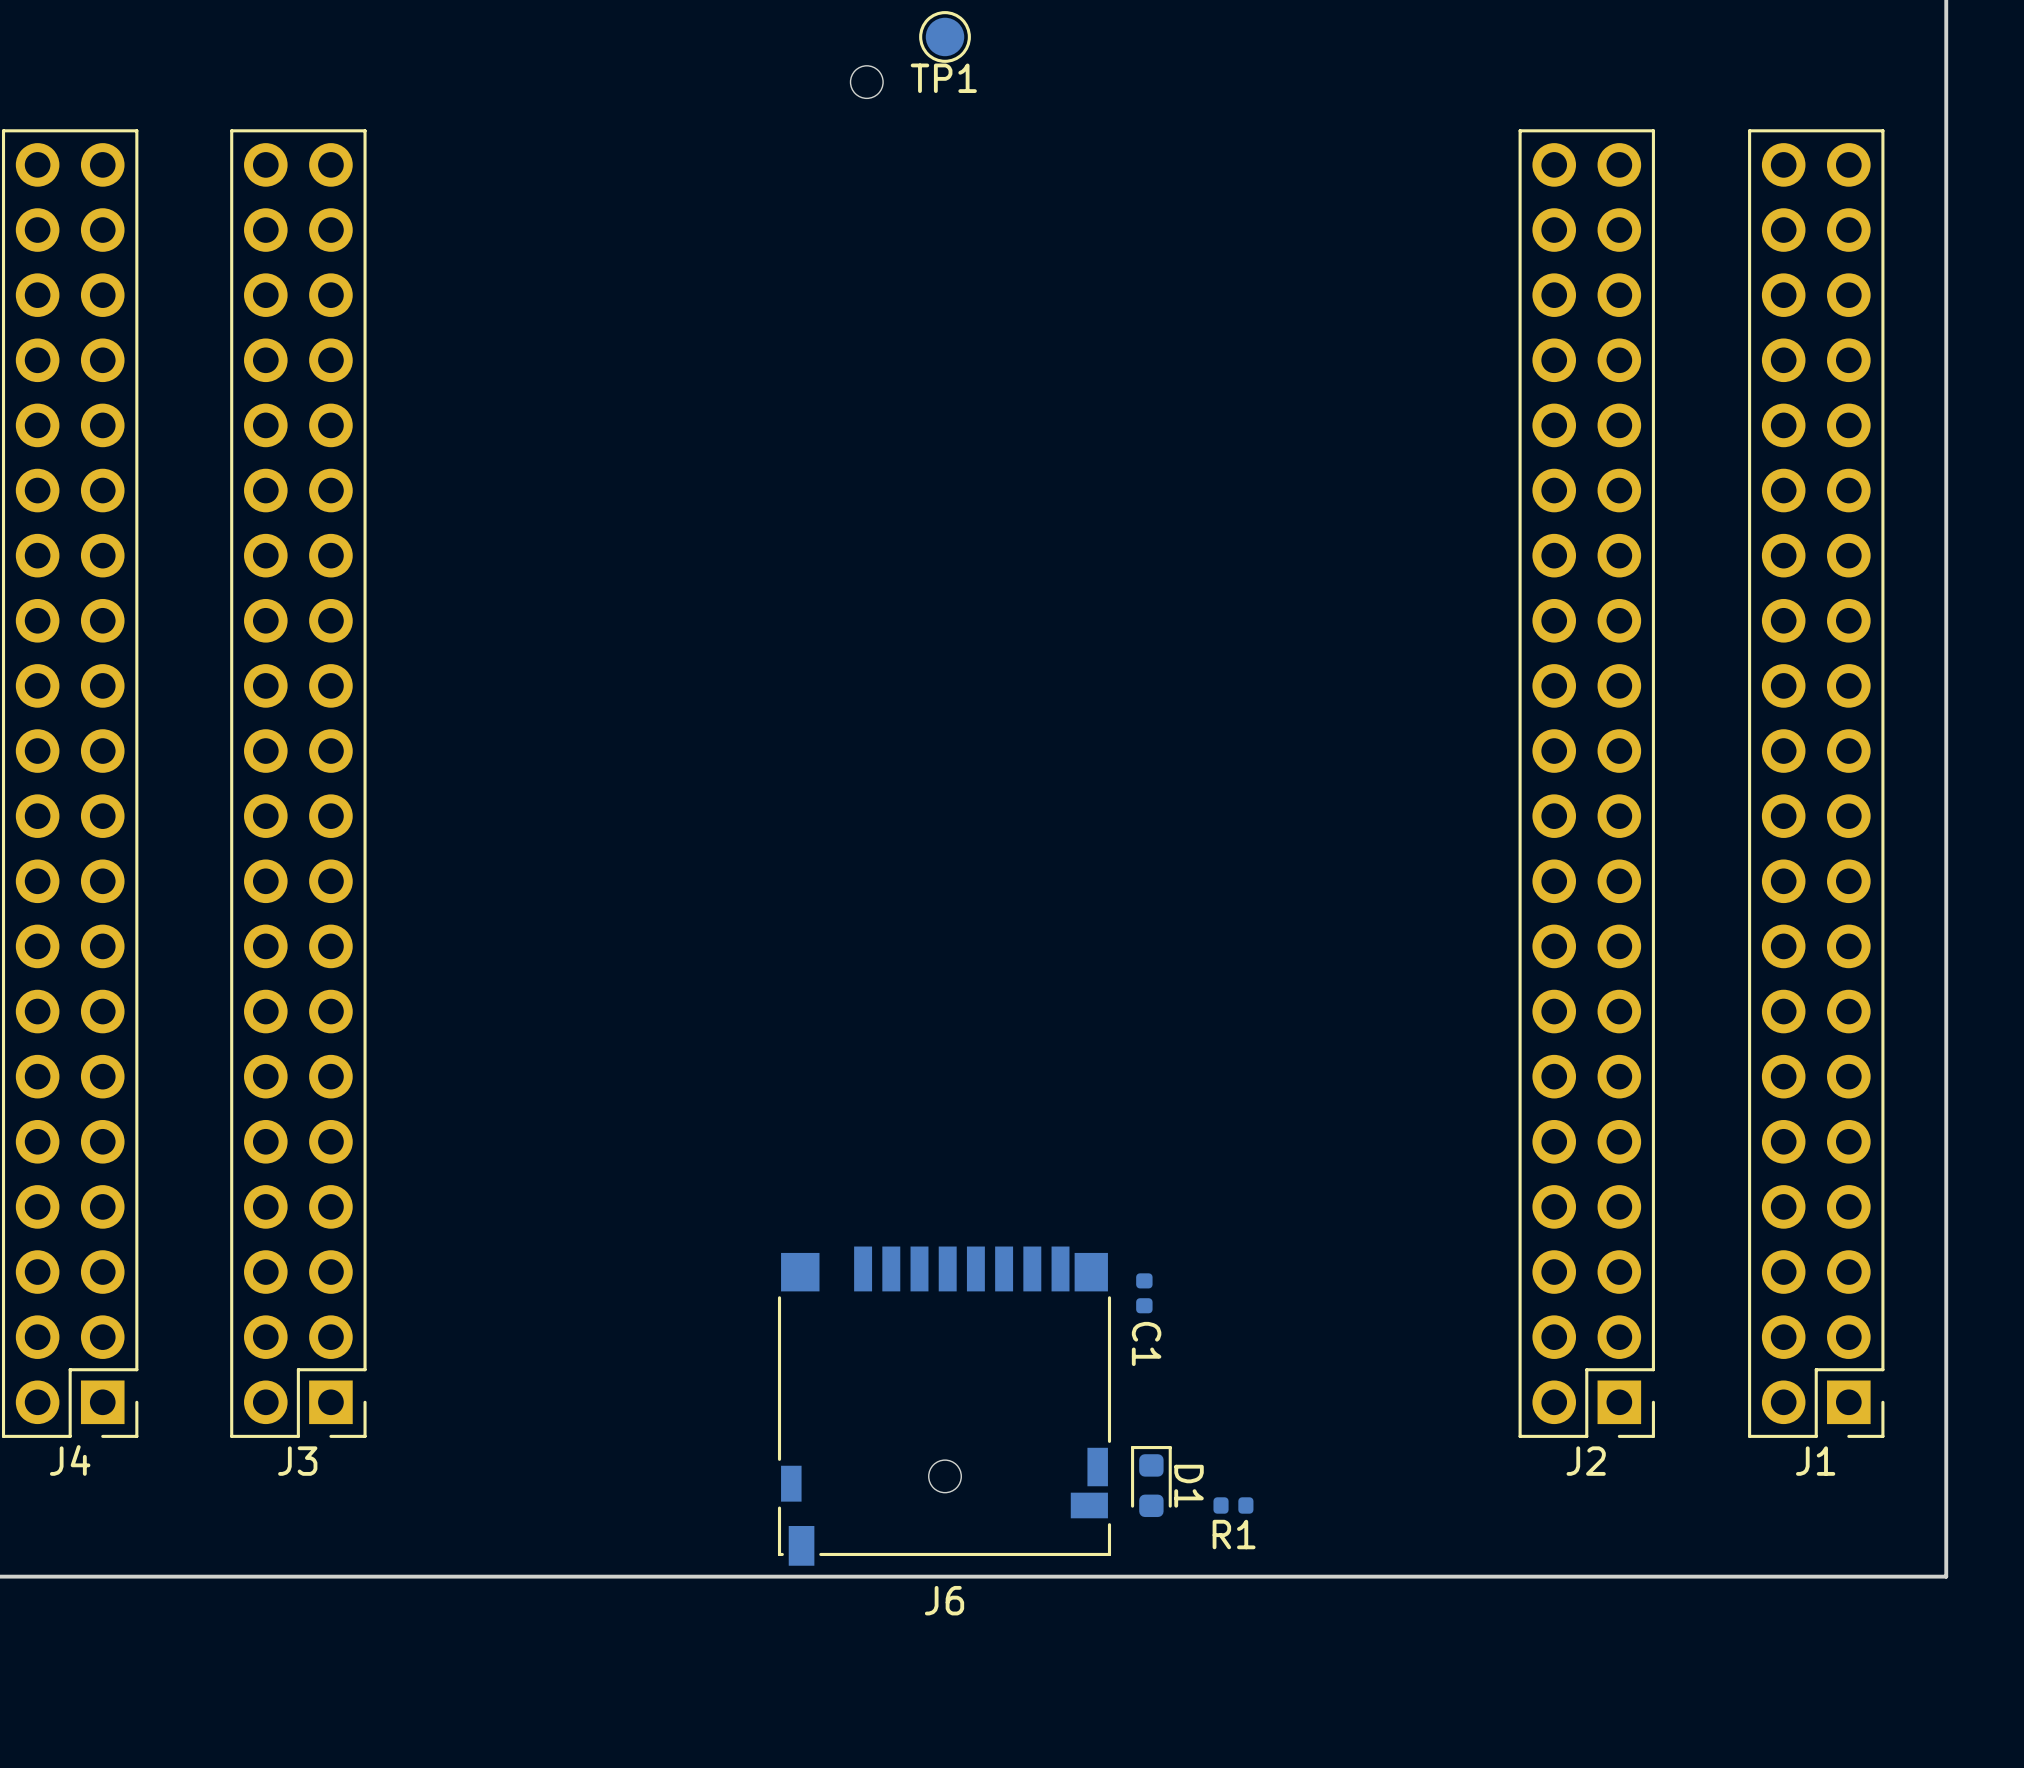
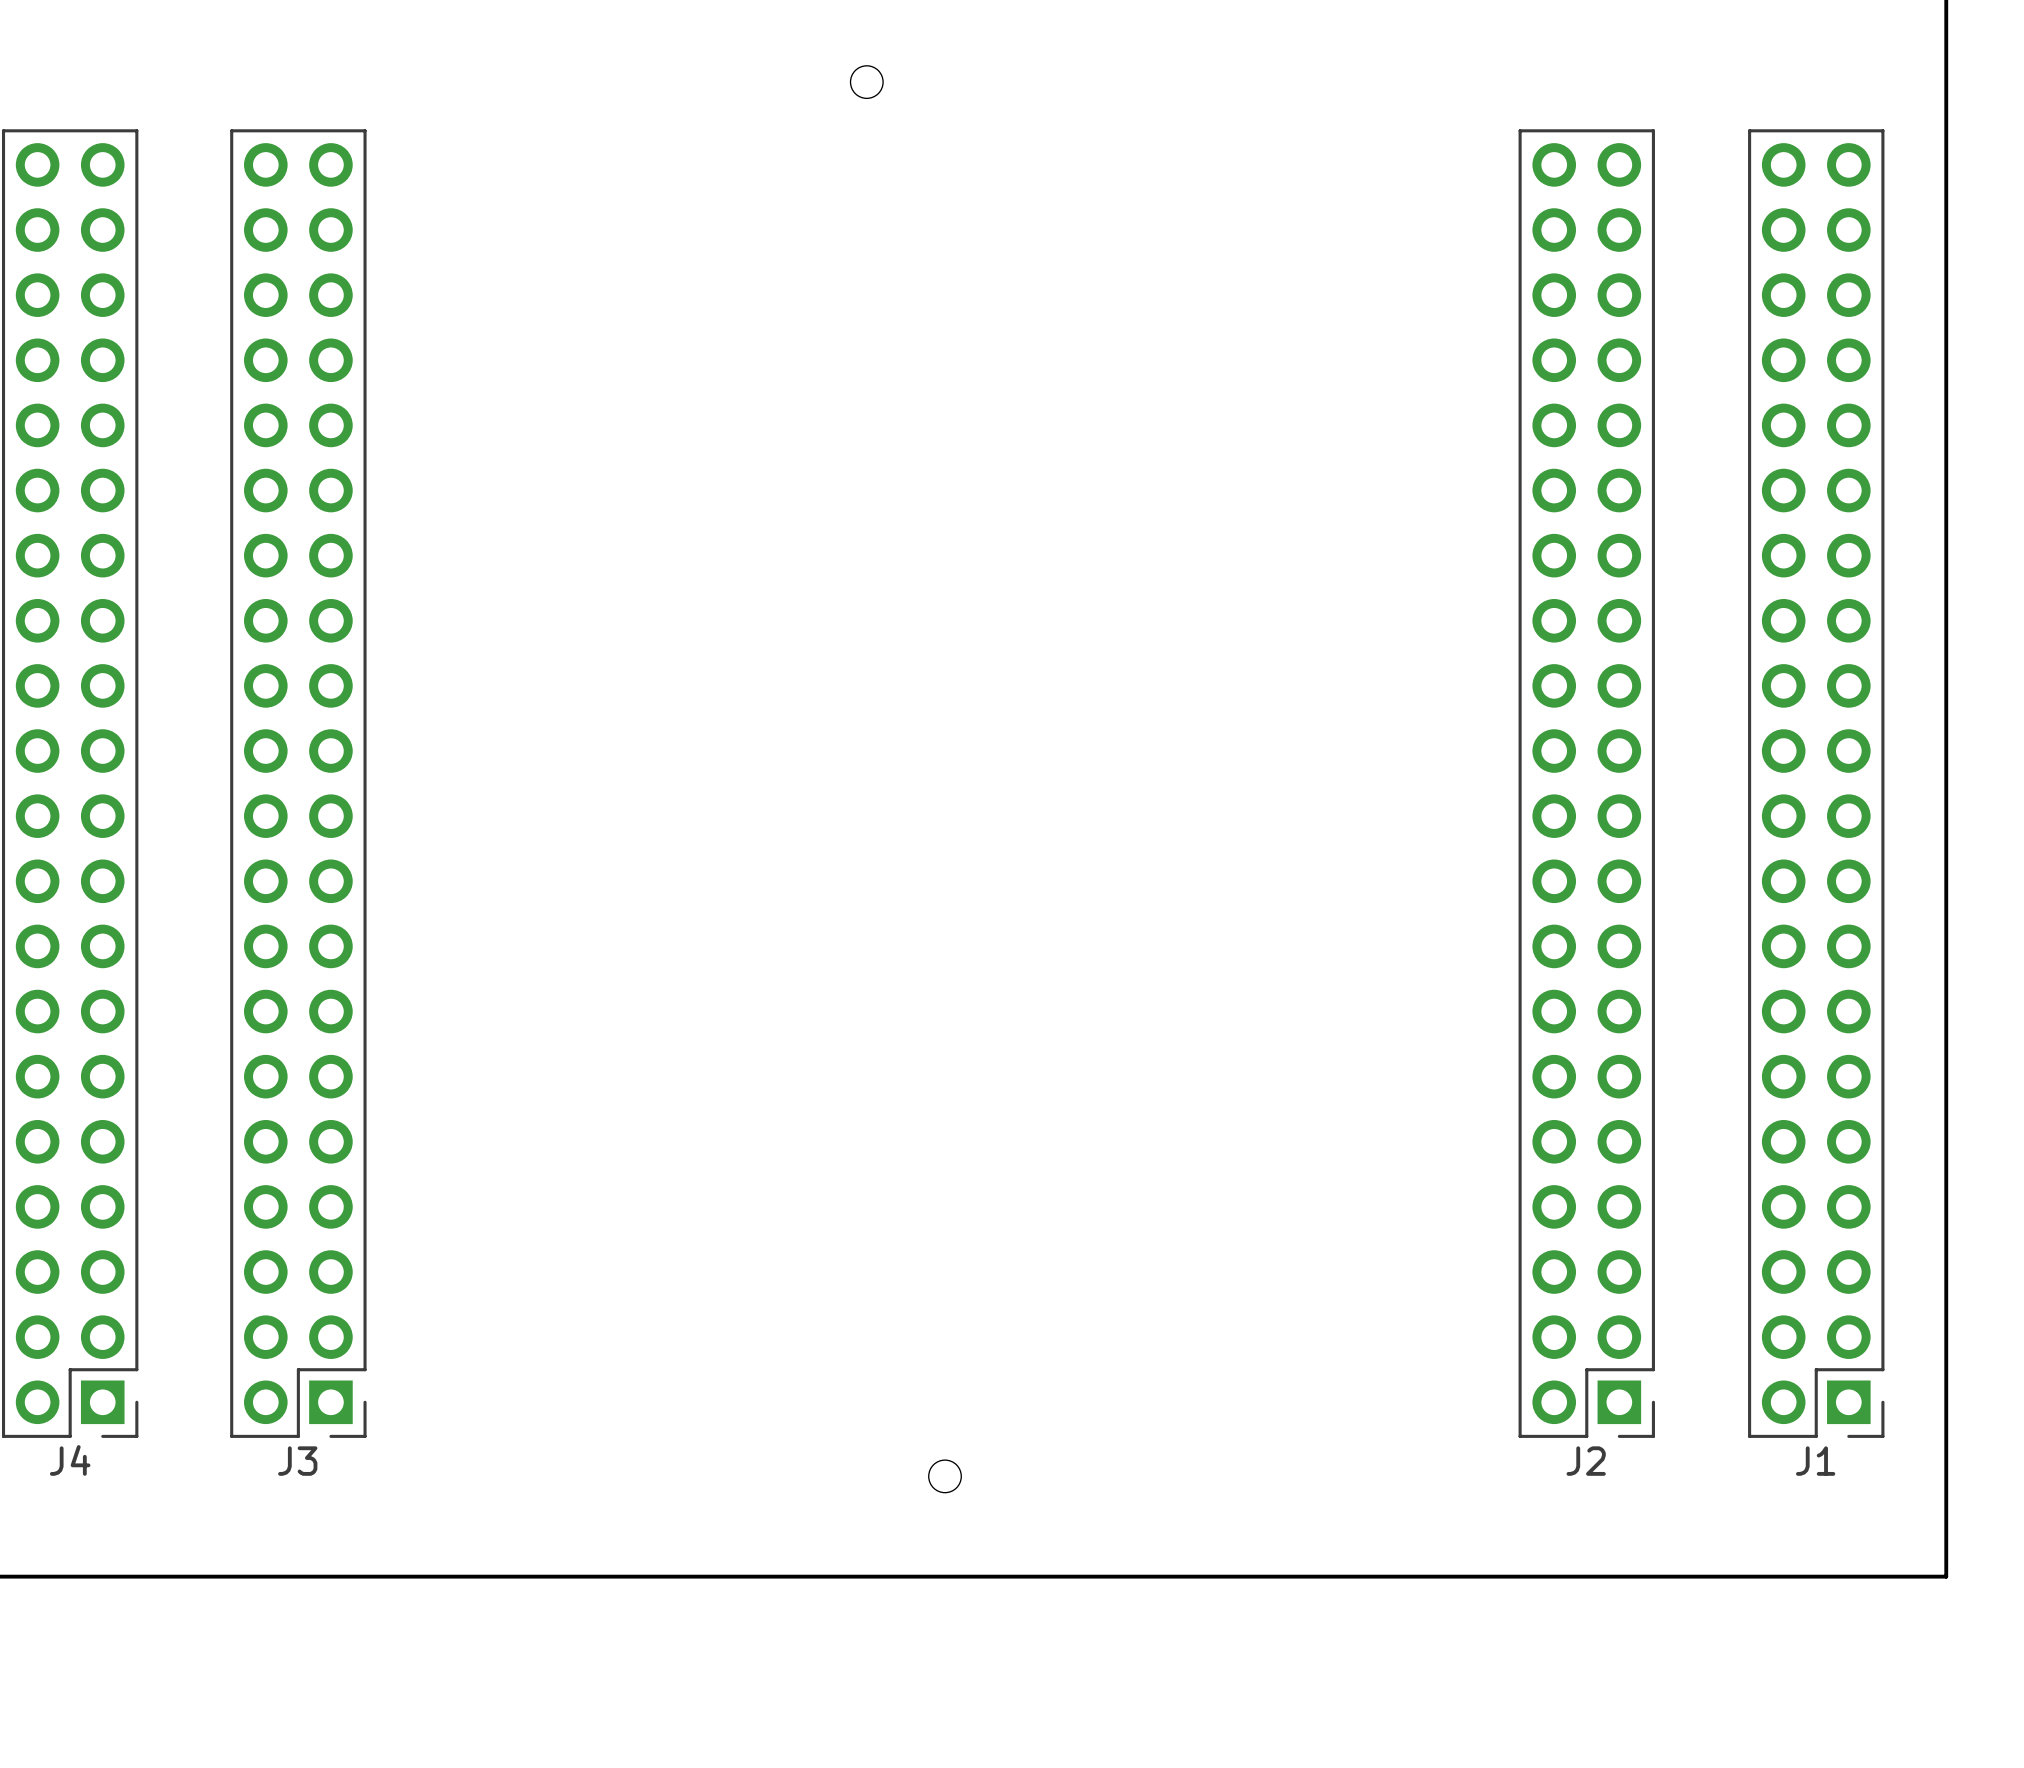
TP1: (945, 36) -> none
C1: (1144, 1293) -> none
J6: (944, 1406) -> none
D1: (1151, 1481) -> none
R1: (1233, 1505) -> none

